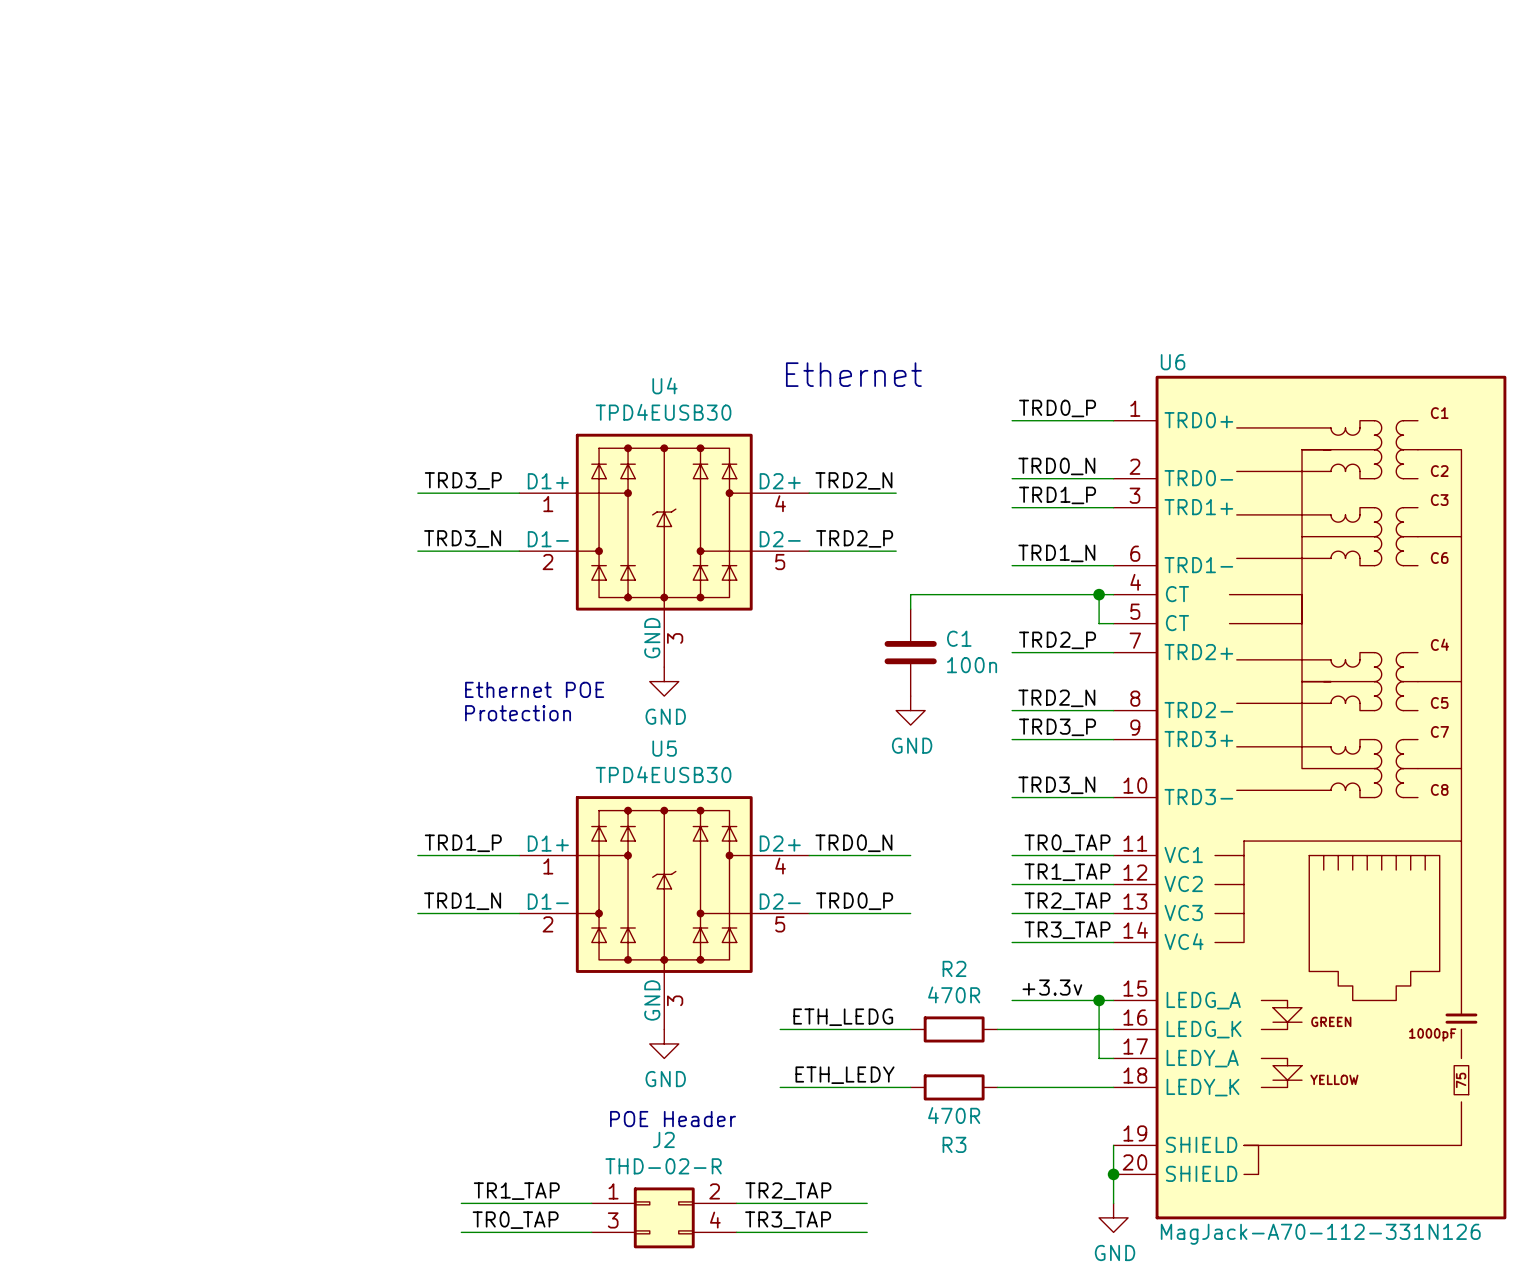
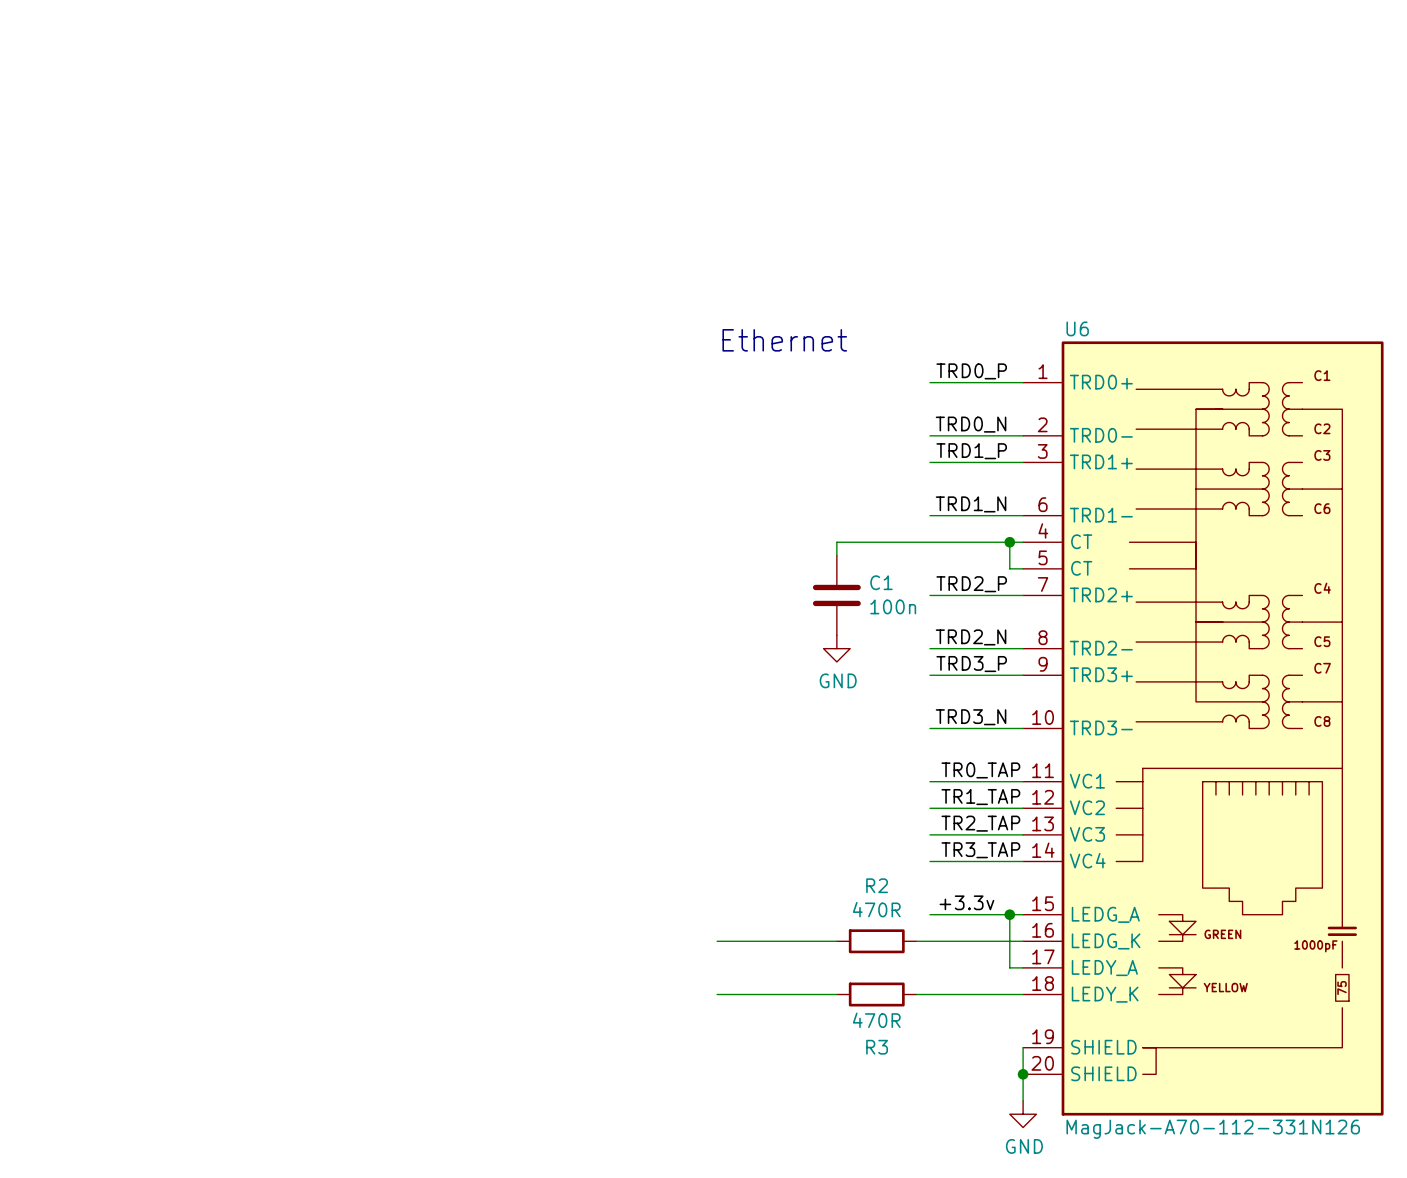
label: TRD3_P (463, 480) -> none
label: TRD2_N (853, 480) -> none
wire: (417, 493) (519, 493) -> none
wire: (809, 493) (896, 493) -> none
label: TRD3_N (462, 538) -> none
label: TRD2_P (854, 538) -> none
U4: TPD4EUSB30 (664, 550) -> none
wire: (417, 551) (519, 551) -> none
wire: (809, 551) (896, 551) -> none
power symbol: GND (664, 681) -> none
text: Ethernet POE (534, 689) -> none
text: Protection (518, 713) -> none
label: TRD1_P (463, 843) -> none
label: TRD0_N (853, 843) -> none
wire: (417, 855) (519, 855) -> none
wire: (809, 855) (910, 855) -> none
label: TRD1_N (462, 901) -> none
label: TRD0_P (854, 901) -> none
U5: TPD4EUSB30 (664, 912) -> none
wire: (417, 913) (519, 913) -> none
wire: (809, 913) (910, 913) -> none
label: ETH_LEDG (843, 1017) -> none
power symbol: GND (664, 1043) -> none
label: ETH_LEDY (844, 1075) -> none
text: POE Header (673, 1119) -> none
label: TR1_TAP (516, 1191) -> none
label: TR2_TAP (788, 1191) -> none
wire: (461, 1203) (591, 1203) -> none
wire: (736, 1203) (867, 1203) -> none
J2: THD-02-R (664, 1217) -> none
label: TR0_TAP (515, 1220) -> none
label: TR3_TAP (788, 1220) -> none
wire: (461, 1232) (591, 1232) -> none
wire: (736, 1232) (867, 1232) -> none

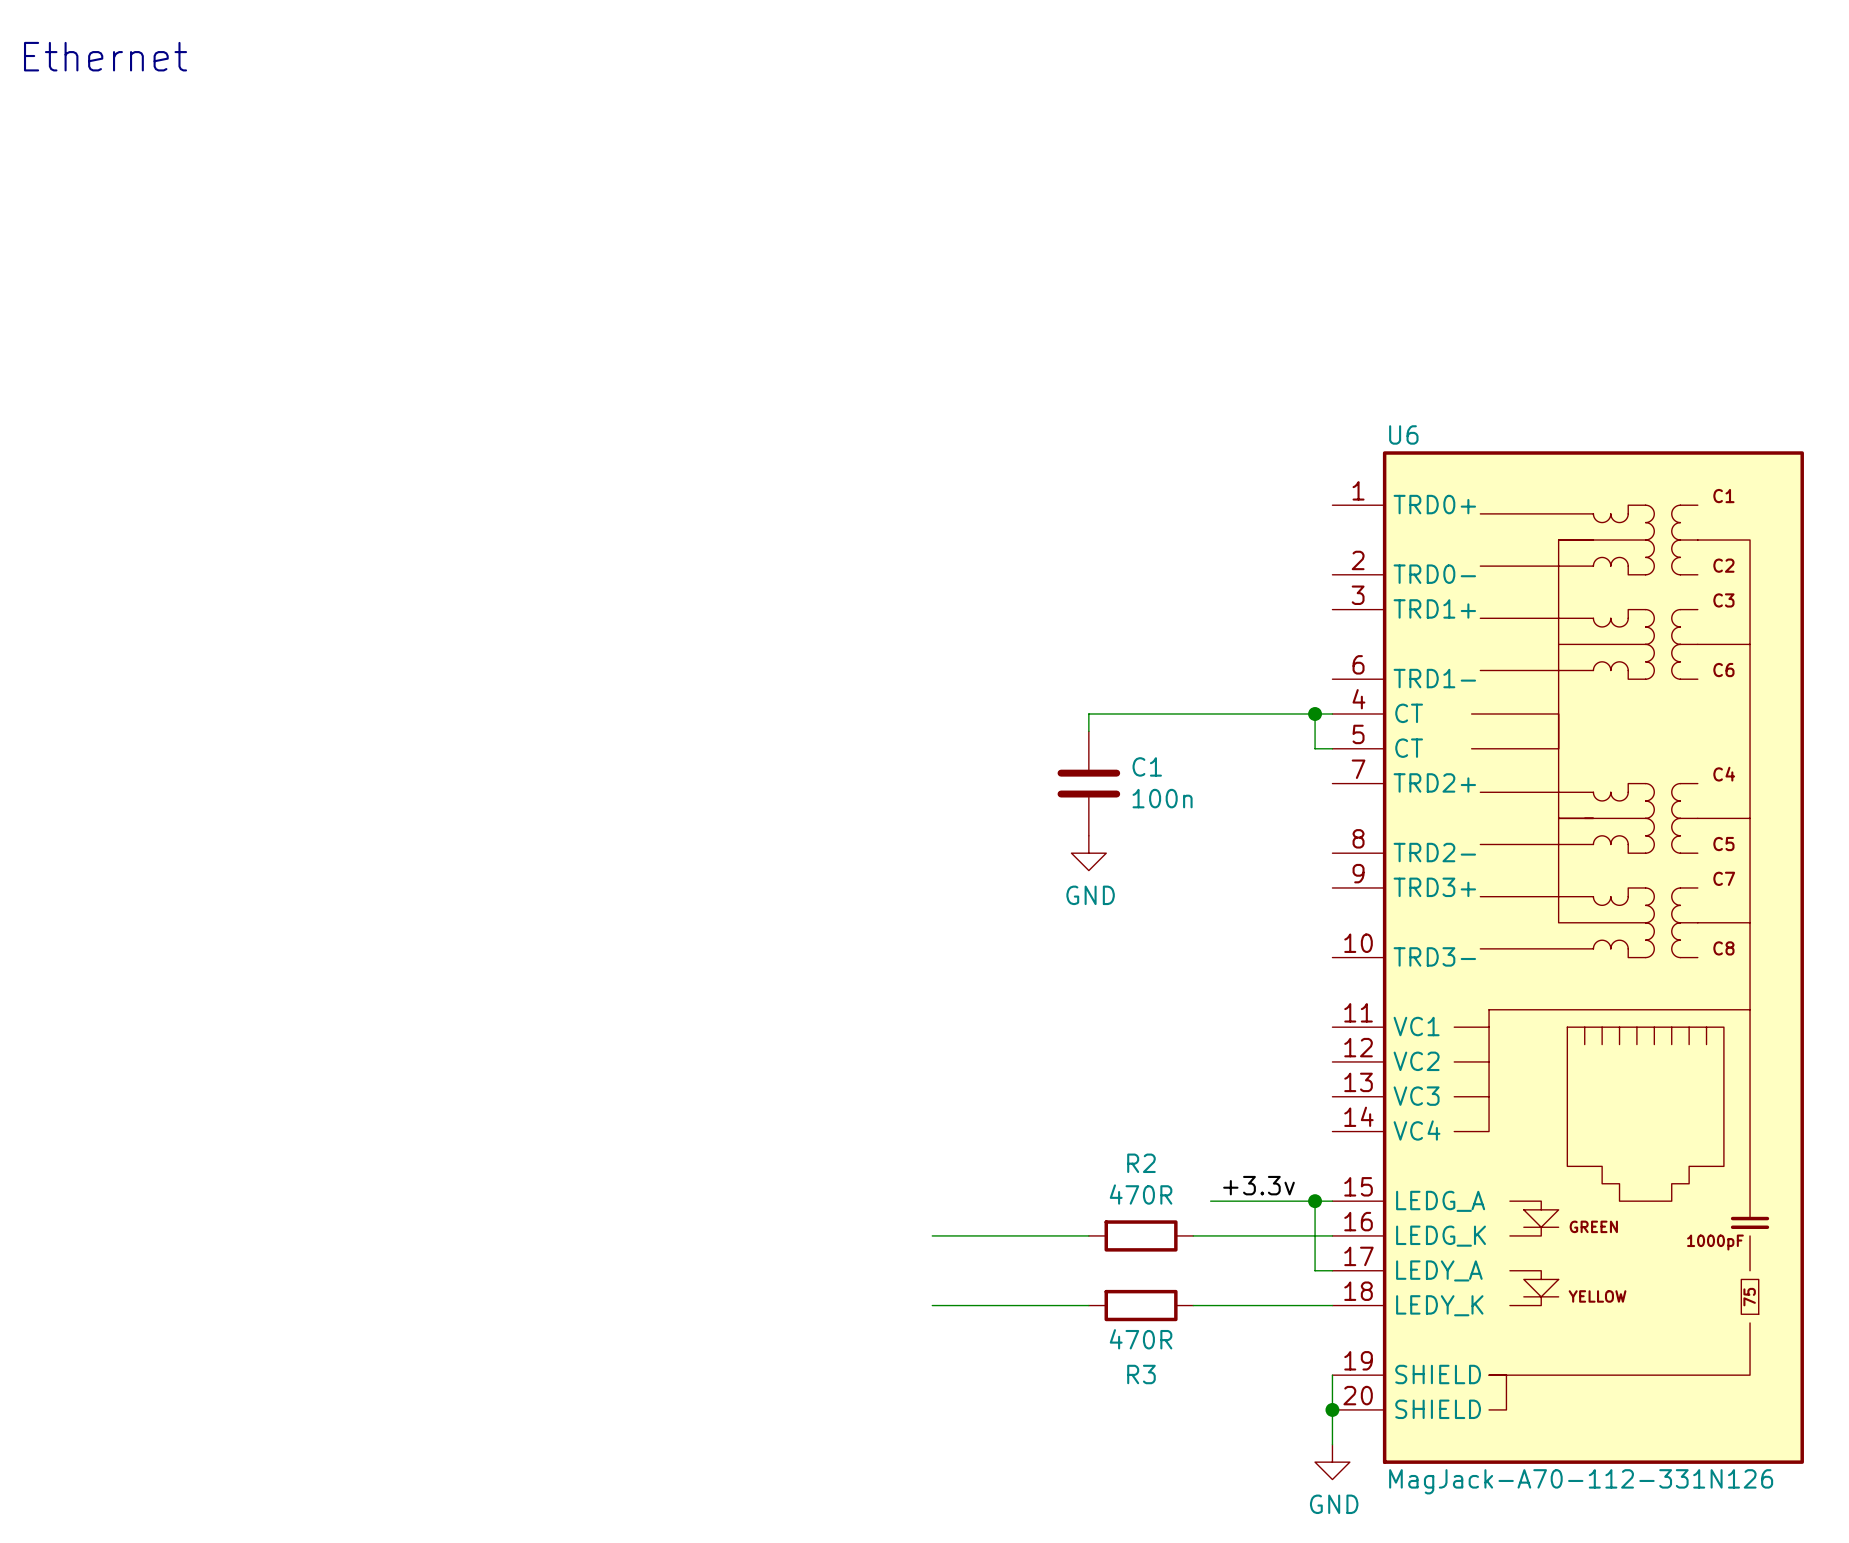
text: none -> Ethernet (105, 56)
text: Ethernet (784, 340) -> none
label: TRD0_P (971, 371) -> none
wire: (929, 382) (1023, 382) -> none
label: TRD0_N (971, 424) -> none
wire: (929, 435) (1023, 435) -> none
label: TRD1_P (971, 451) -> none
wire: (929, 462) (1023, 462) -> none
label: TRD1_N (971, 504) -> none
wire: (929, 515) (1023, 515) -> none
label: TRD2_P (971, 584) -> none
wire: (929, 595) (1023, 595) -> none
label: TRD2_N (971, 637) -> none
wire: (929, 648) (1023, 648) -> none
label: TRD3_P (971, 664) -> none
wire: (929, 675) (1023, 675) -> none
label: TRD3_N (971, 717) -> none
wire: (929, 728) (1023, 728) -> none
label: TR0_TAP (980, 770) -> none
wire: (929, 781) (1023, 781) -> none
label: TR1_TAP (980, 797) -> none
wire: (929, 808) (1023, 808) -> none
label: TR2_TAP (980, 823) -> none
wire: (929, 834) (1023, 834) -> none
label: TR3_TAP (980, 850) -> none
wire: (929, 861) (1023, 861) -> none

